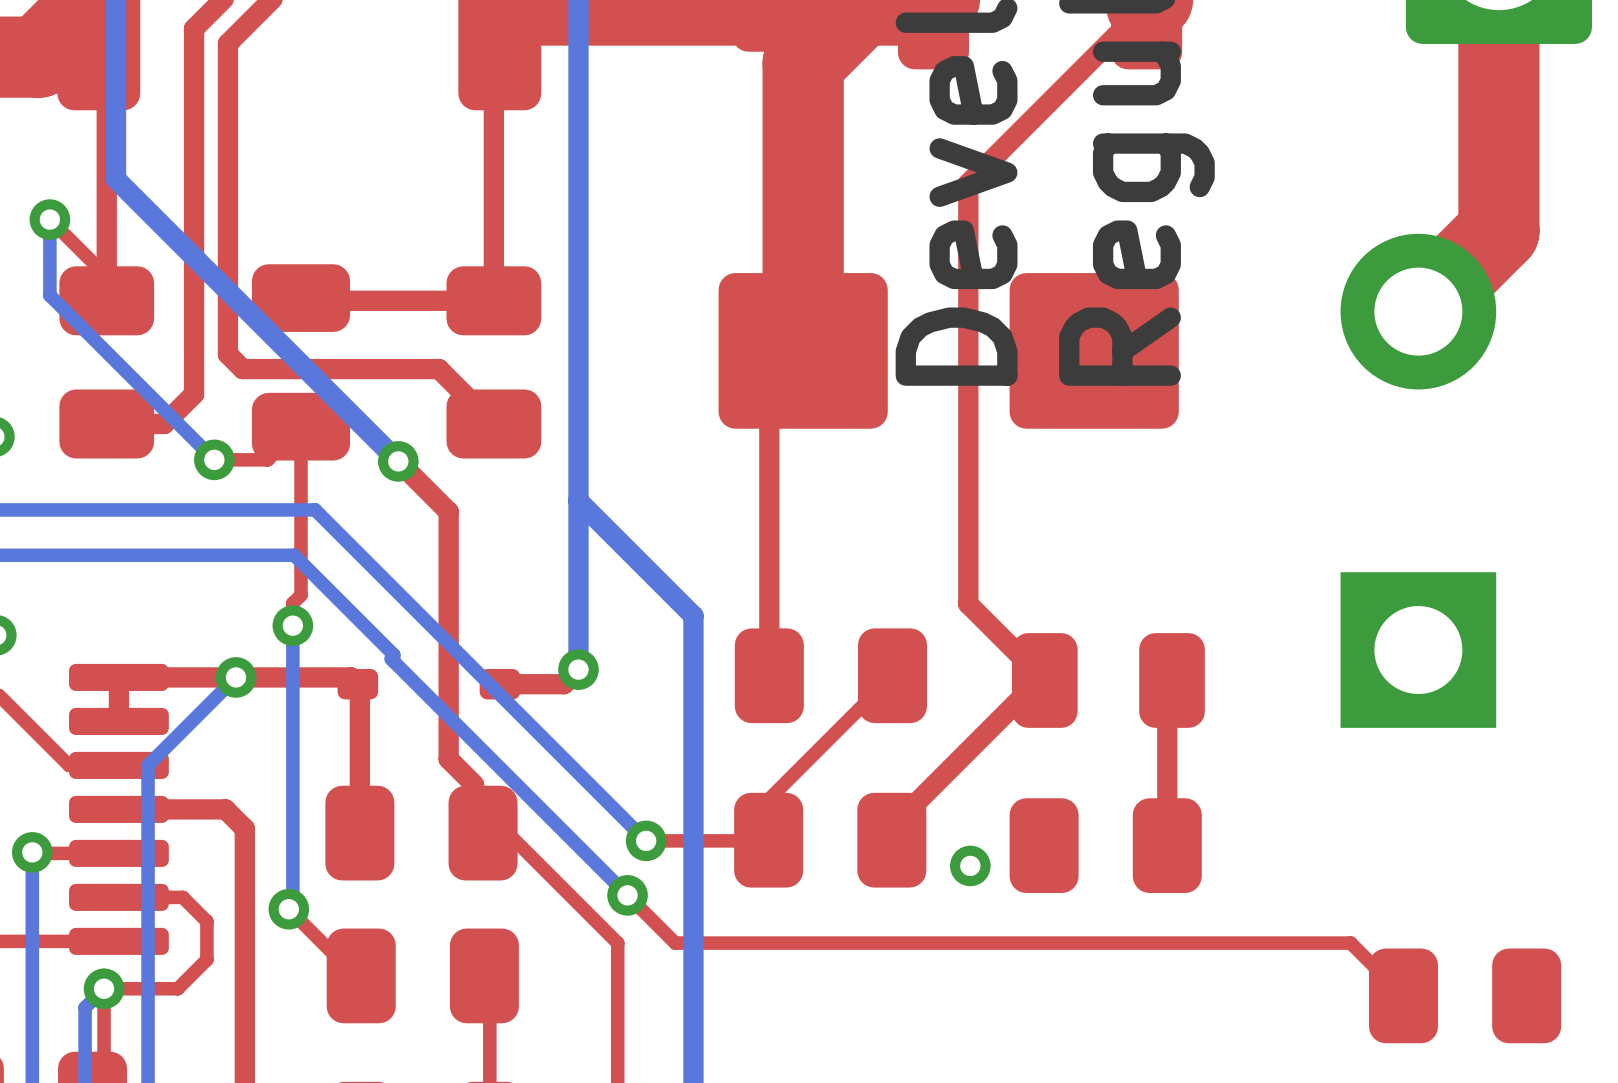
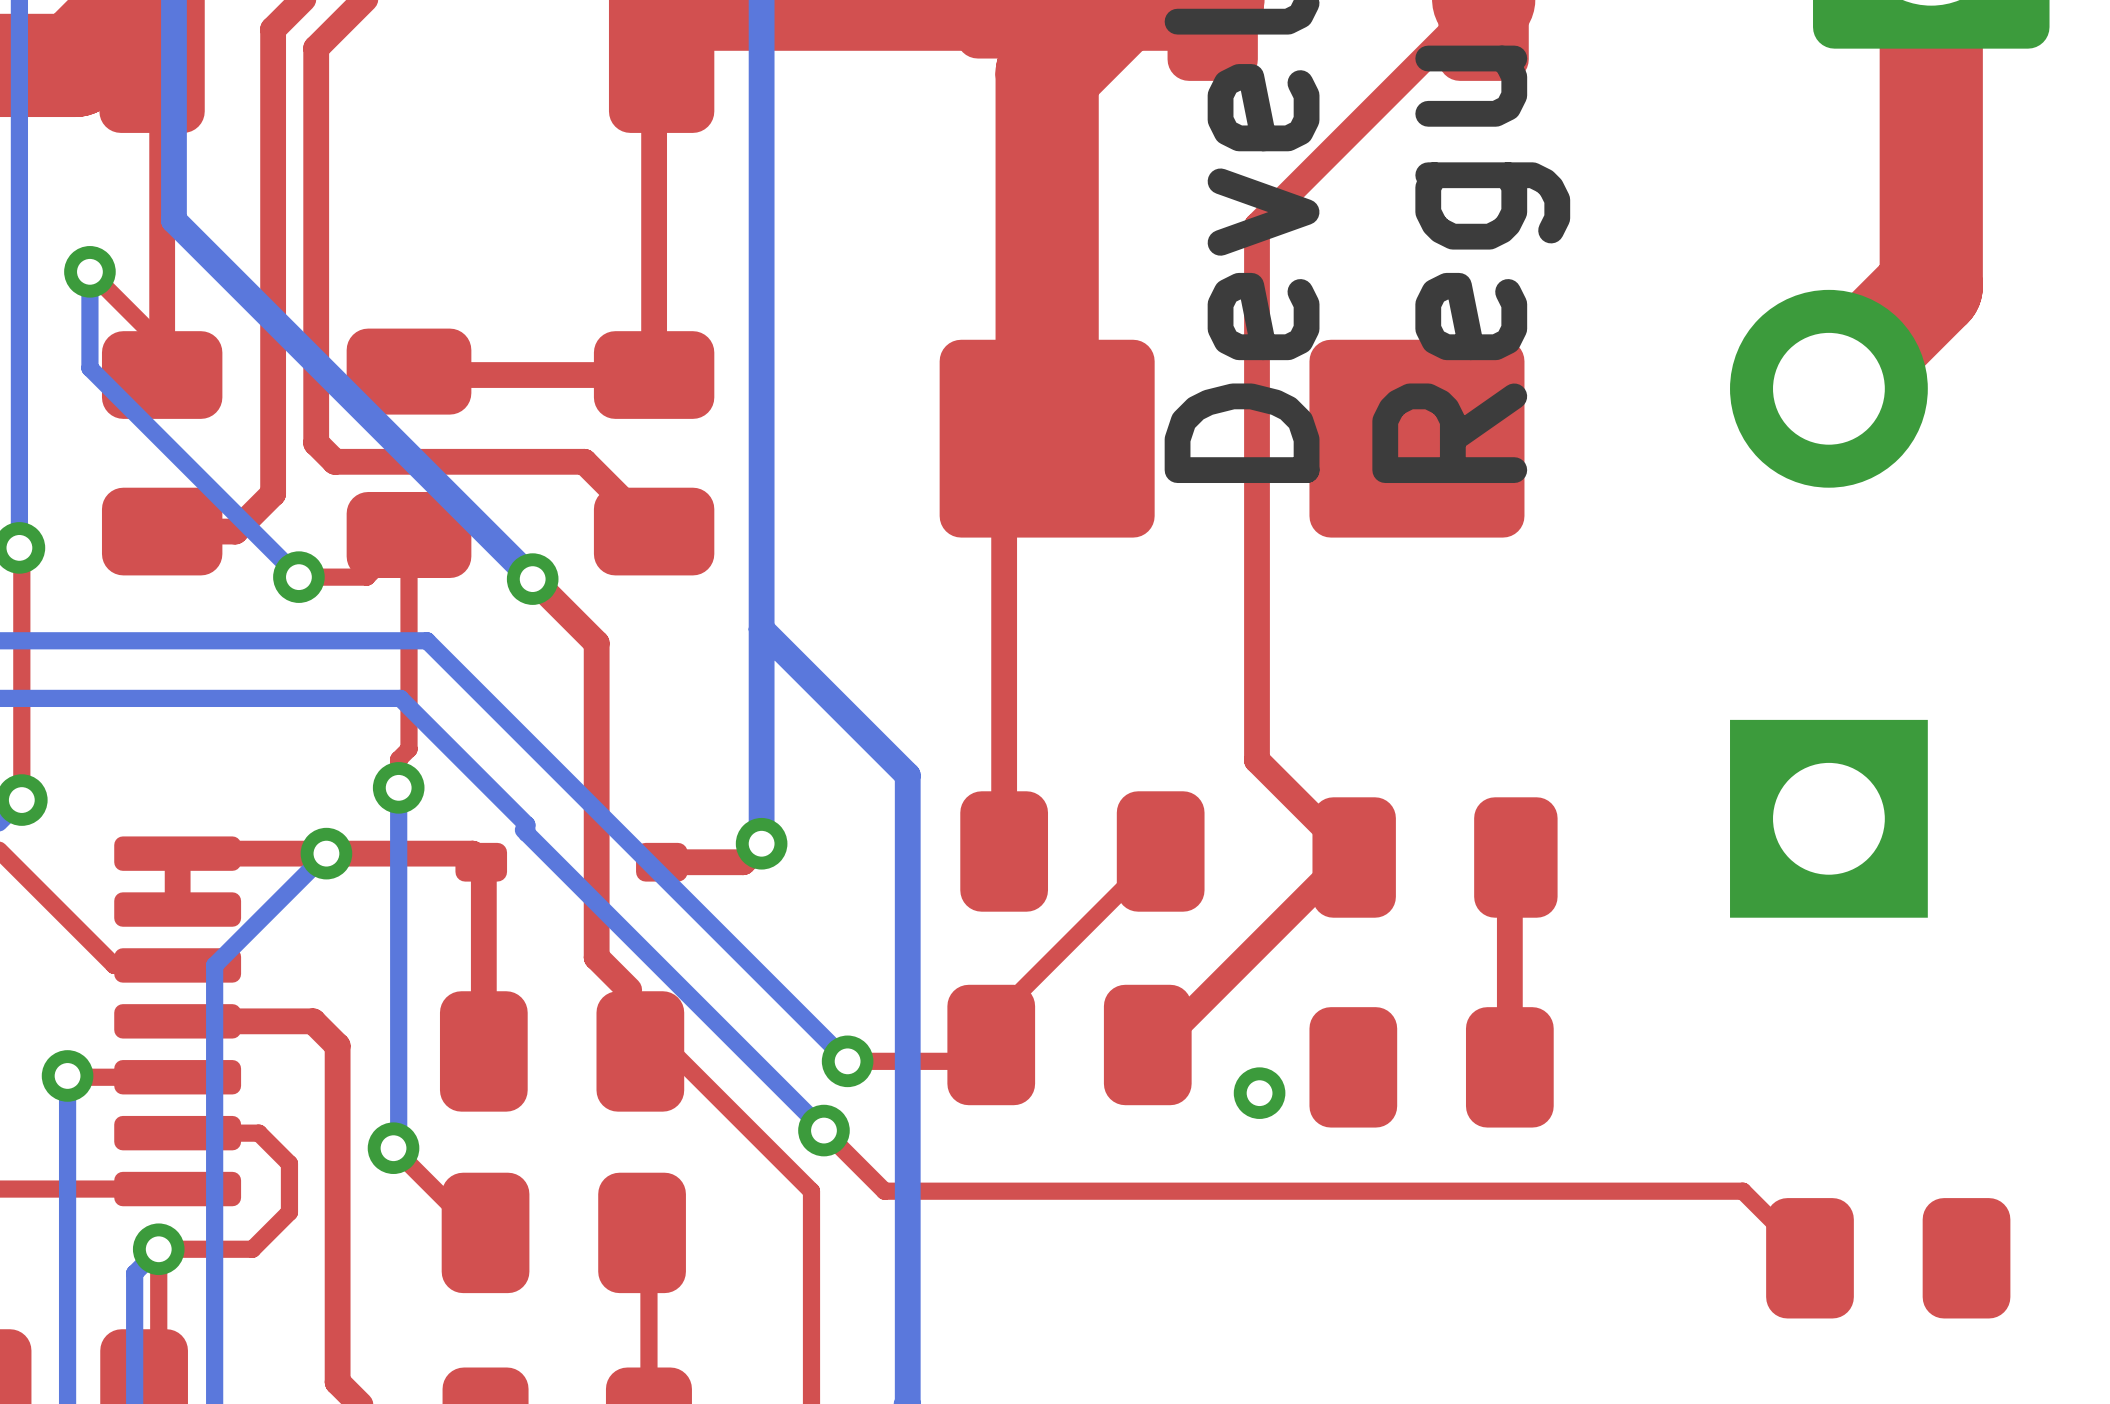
part position: (830, 840) -> (1069, 1044)

